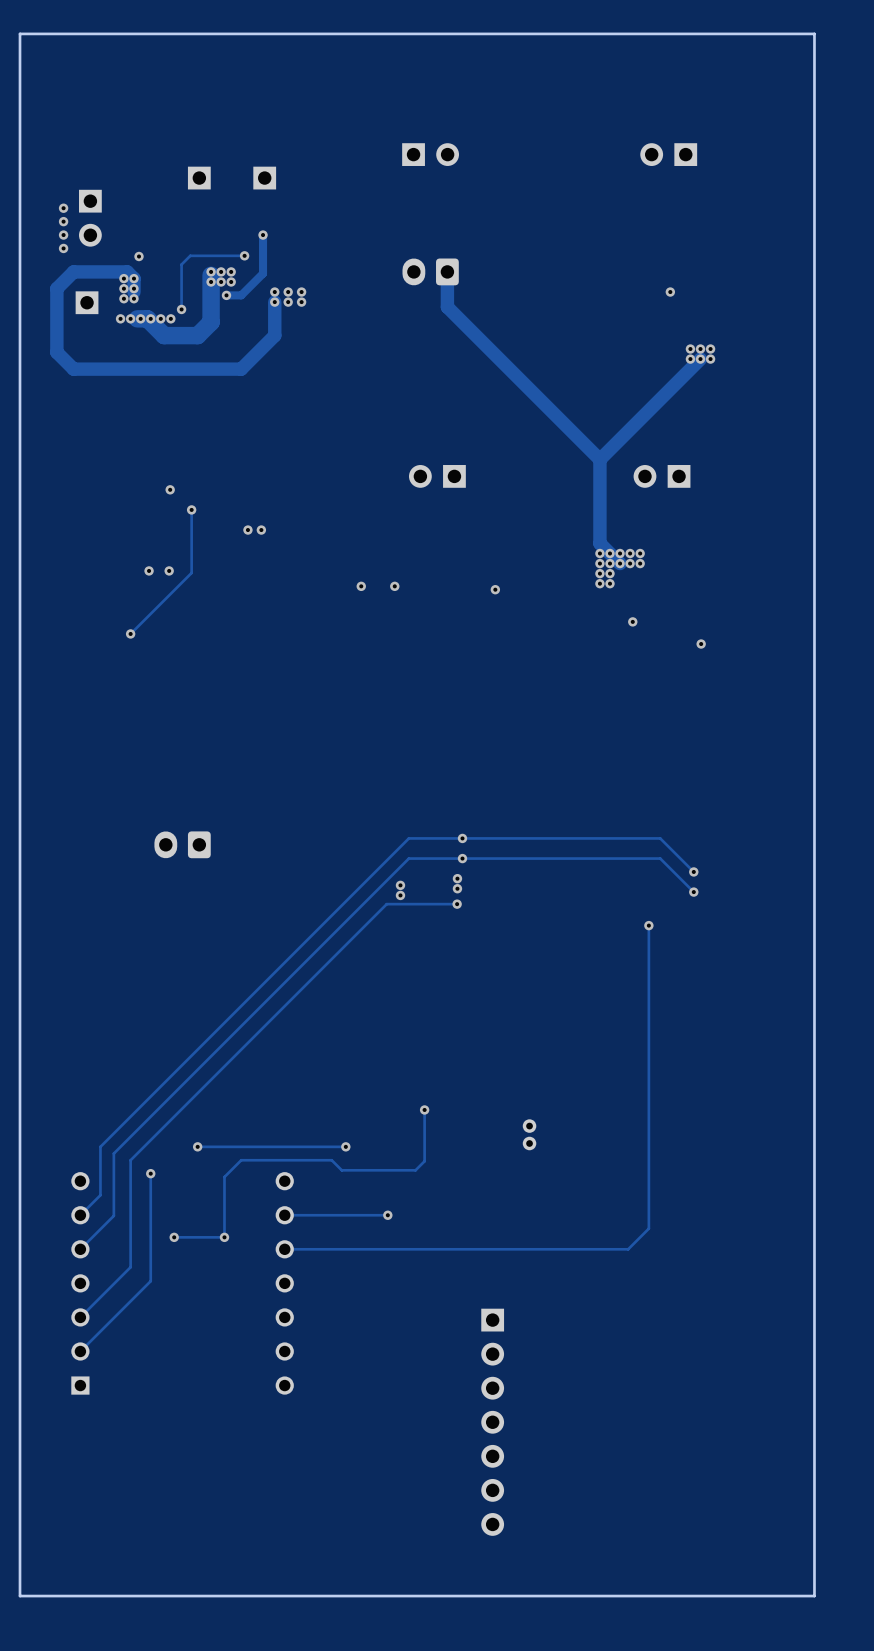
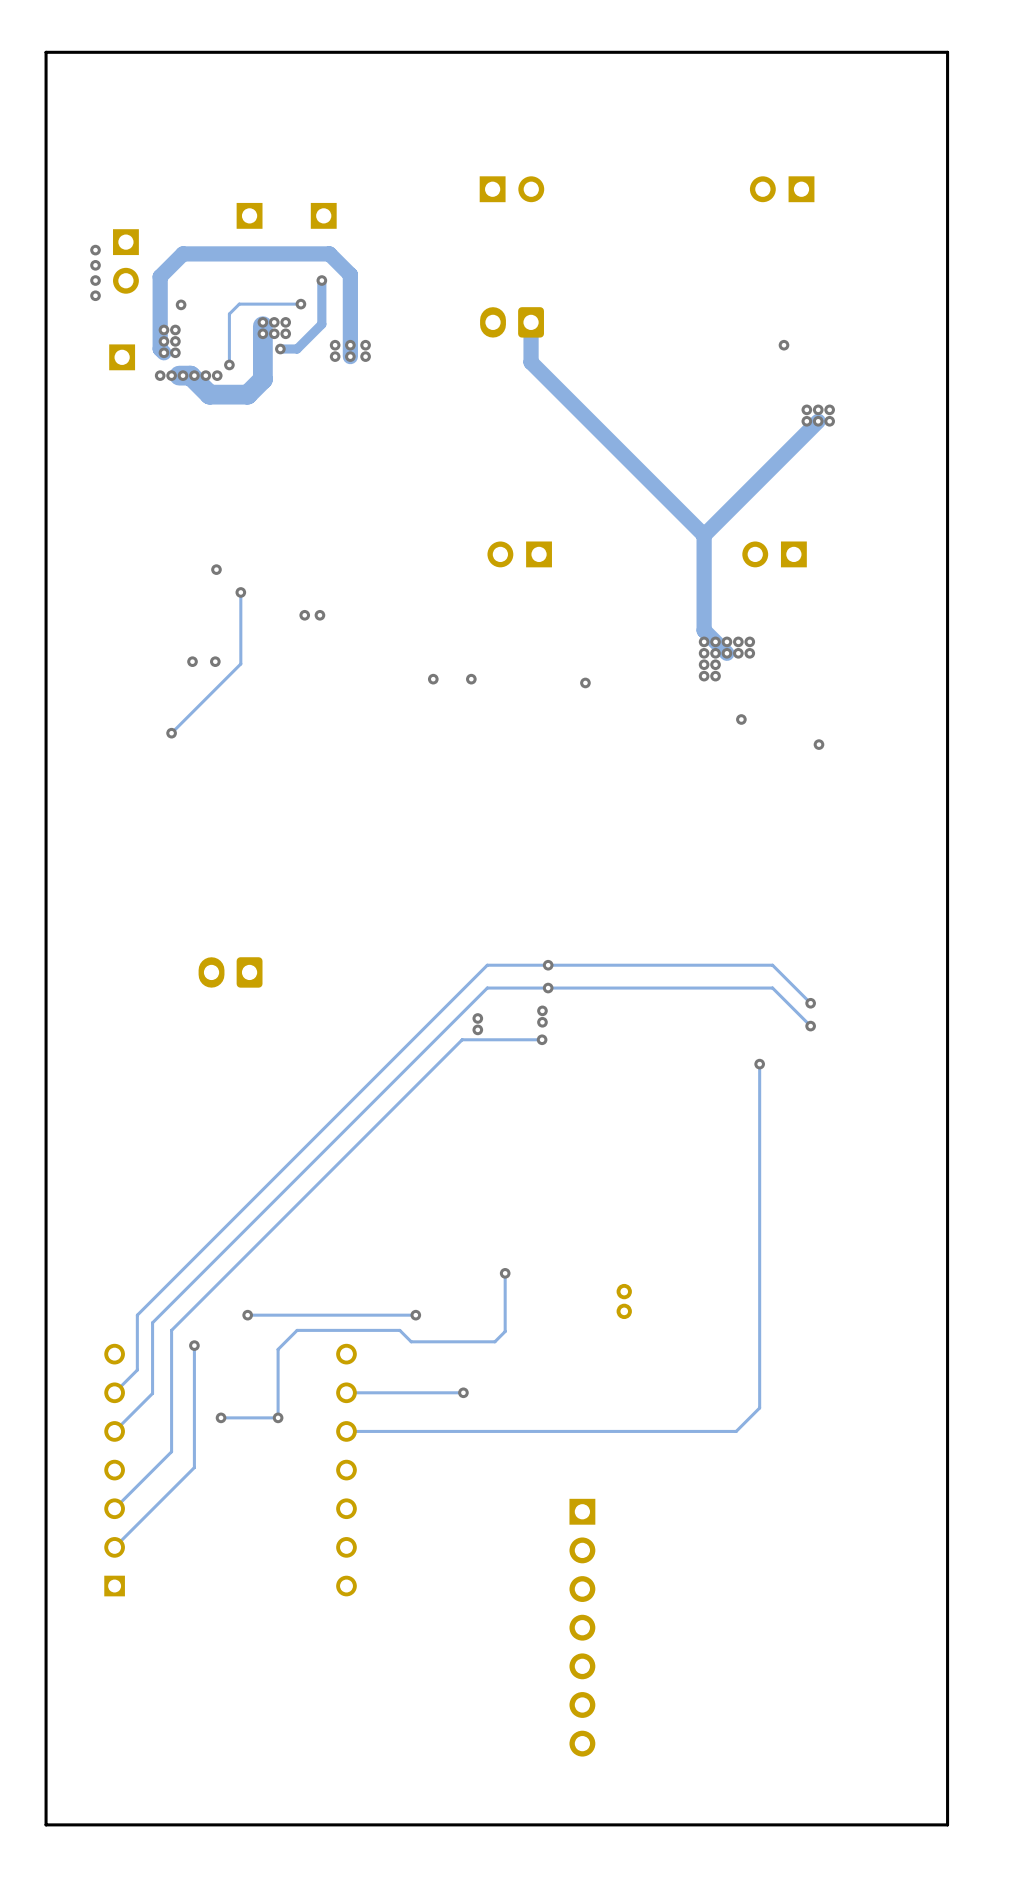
track: (133, 292) (133, 278) (127, 271) (73, 271) (56, 288) (56, 352) (73, 369) (241, 369) (274, 335) (274, 302) -> none
track: none -> (163, 352) (160, 349) (160, 276) (183, 253) (329, 253) (350, 274) (350, 356)

